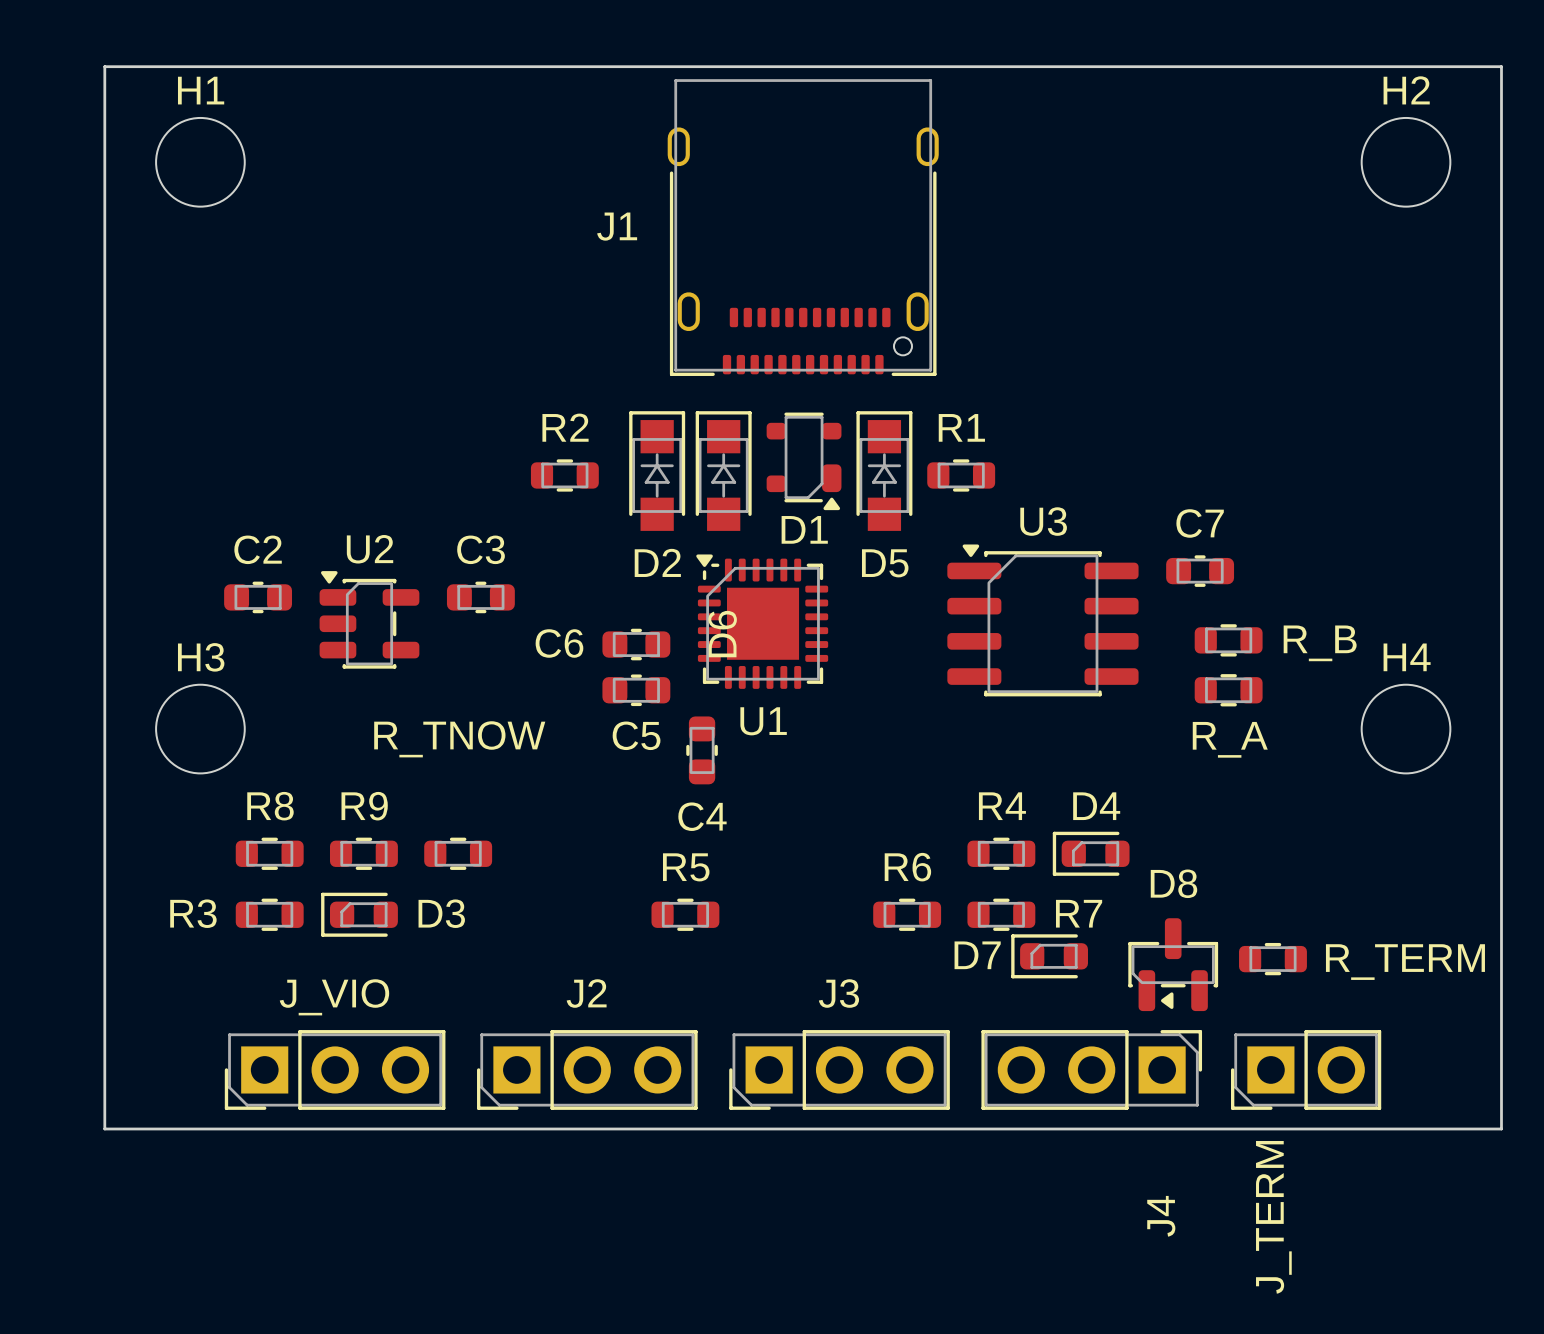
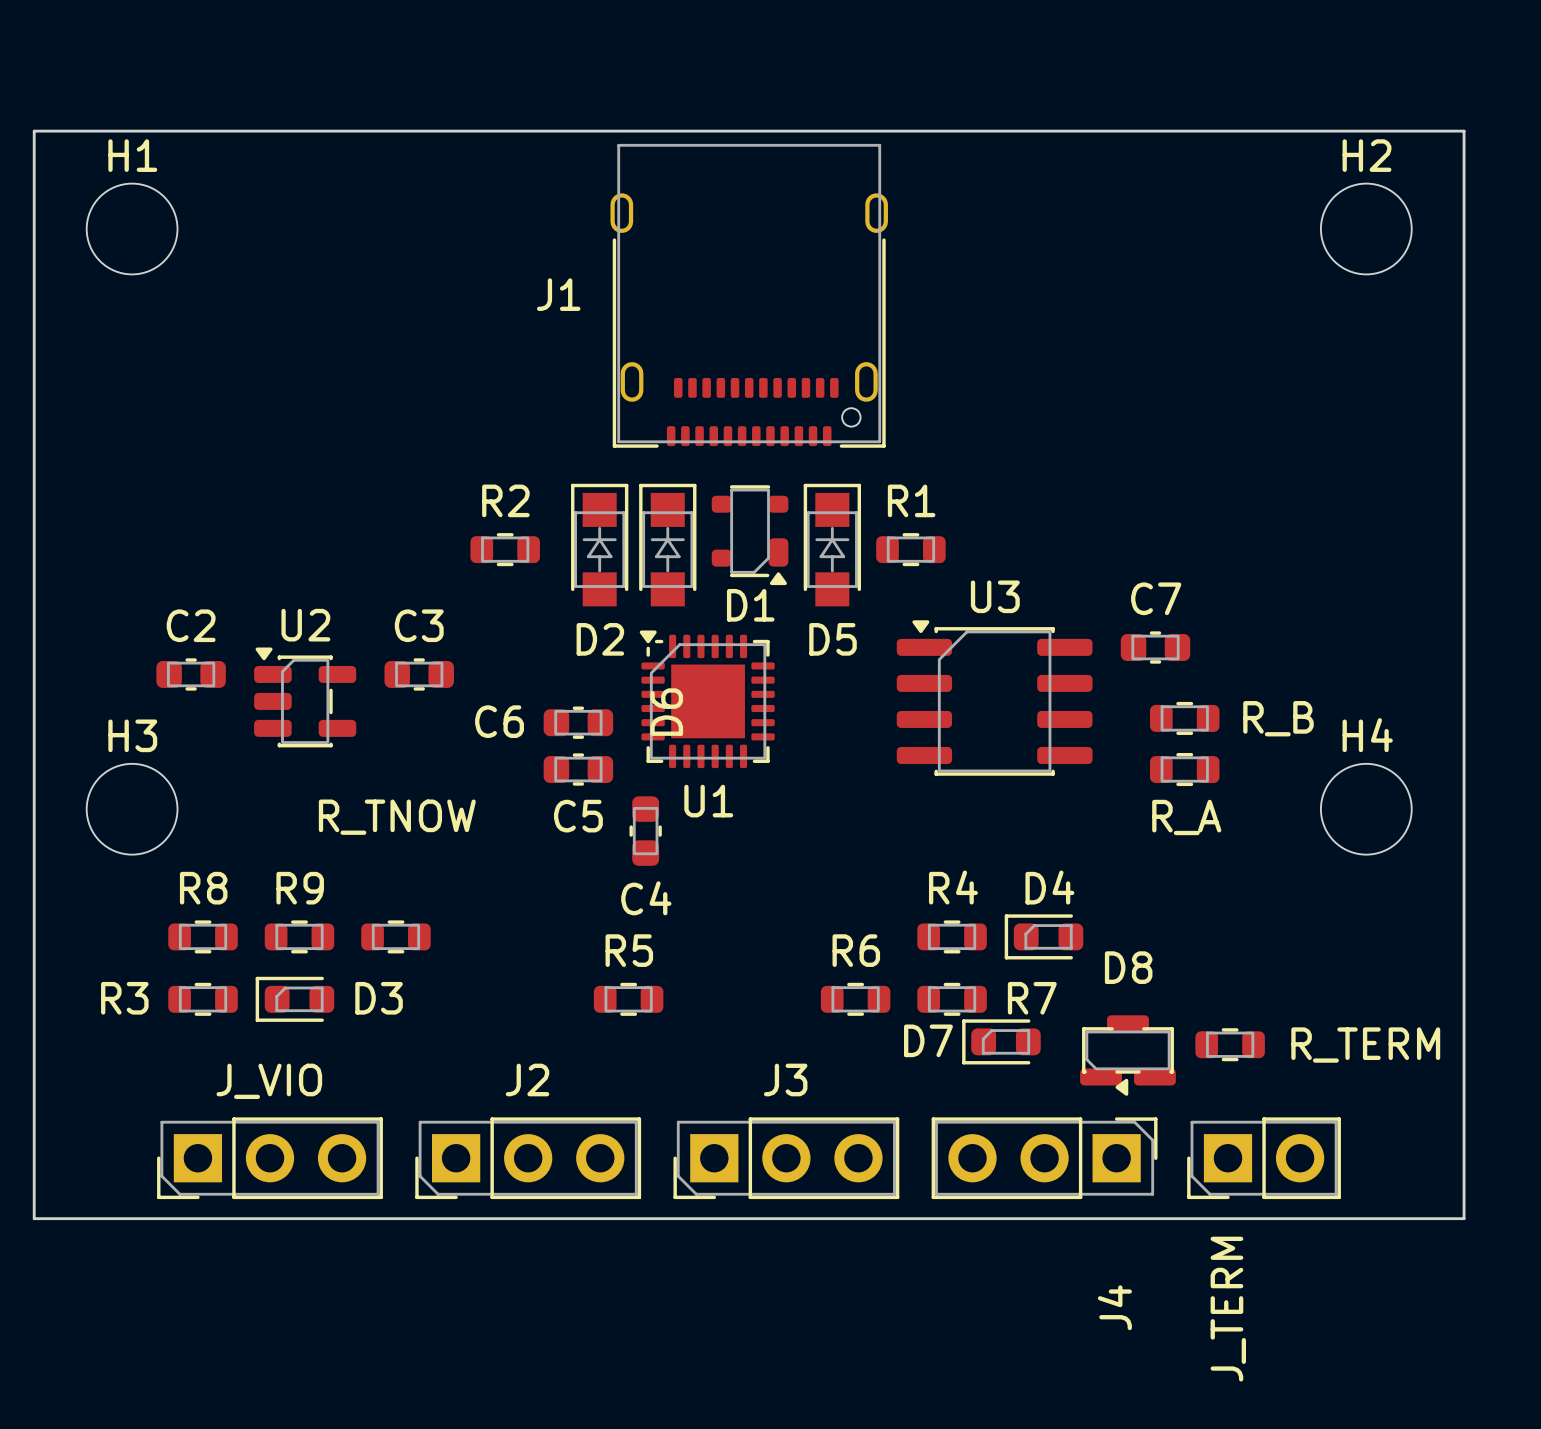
D8 footprint: [1128, 918, 1219, 1012] -> [1080, 1015, 1176, 1096]

